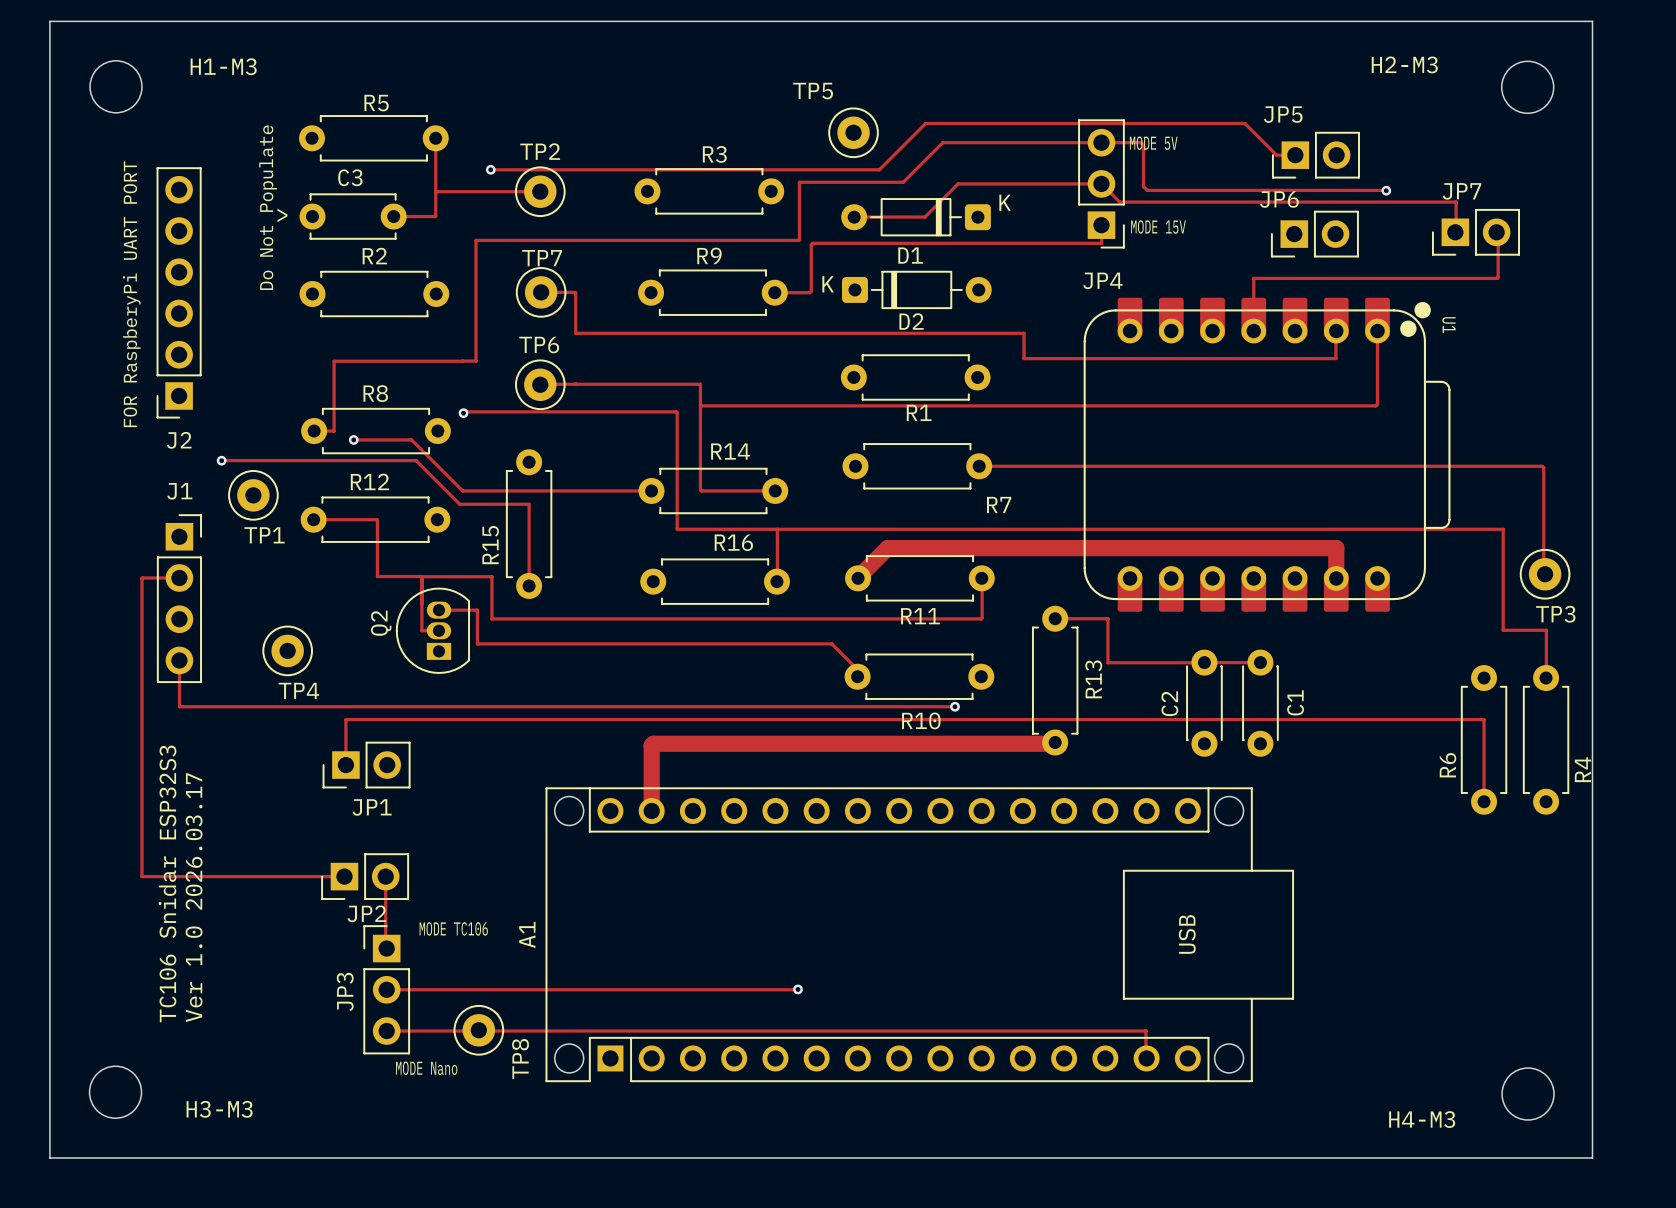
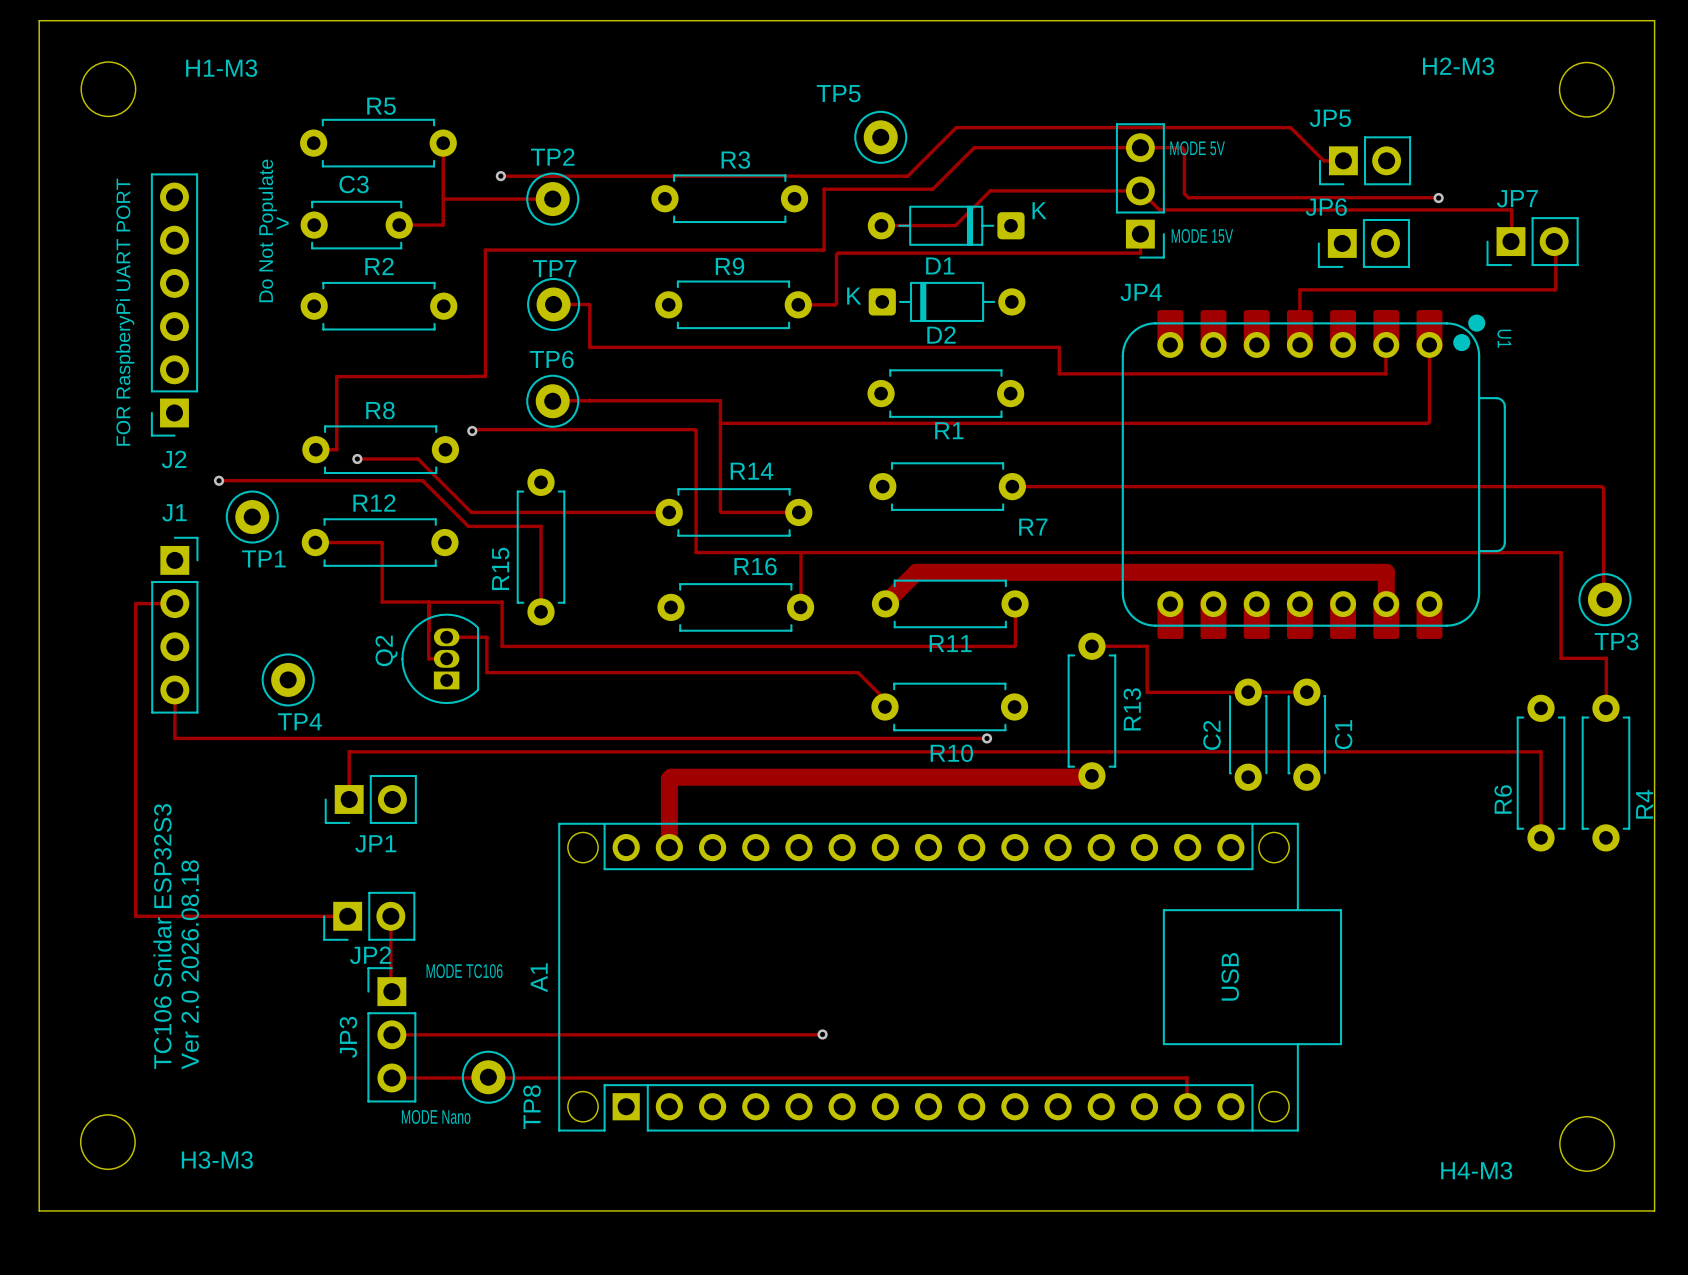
text: Ver 1.0 2026.03.17 (194, 897) -> Ver 2.0 2026.08.18 (190, 964)

